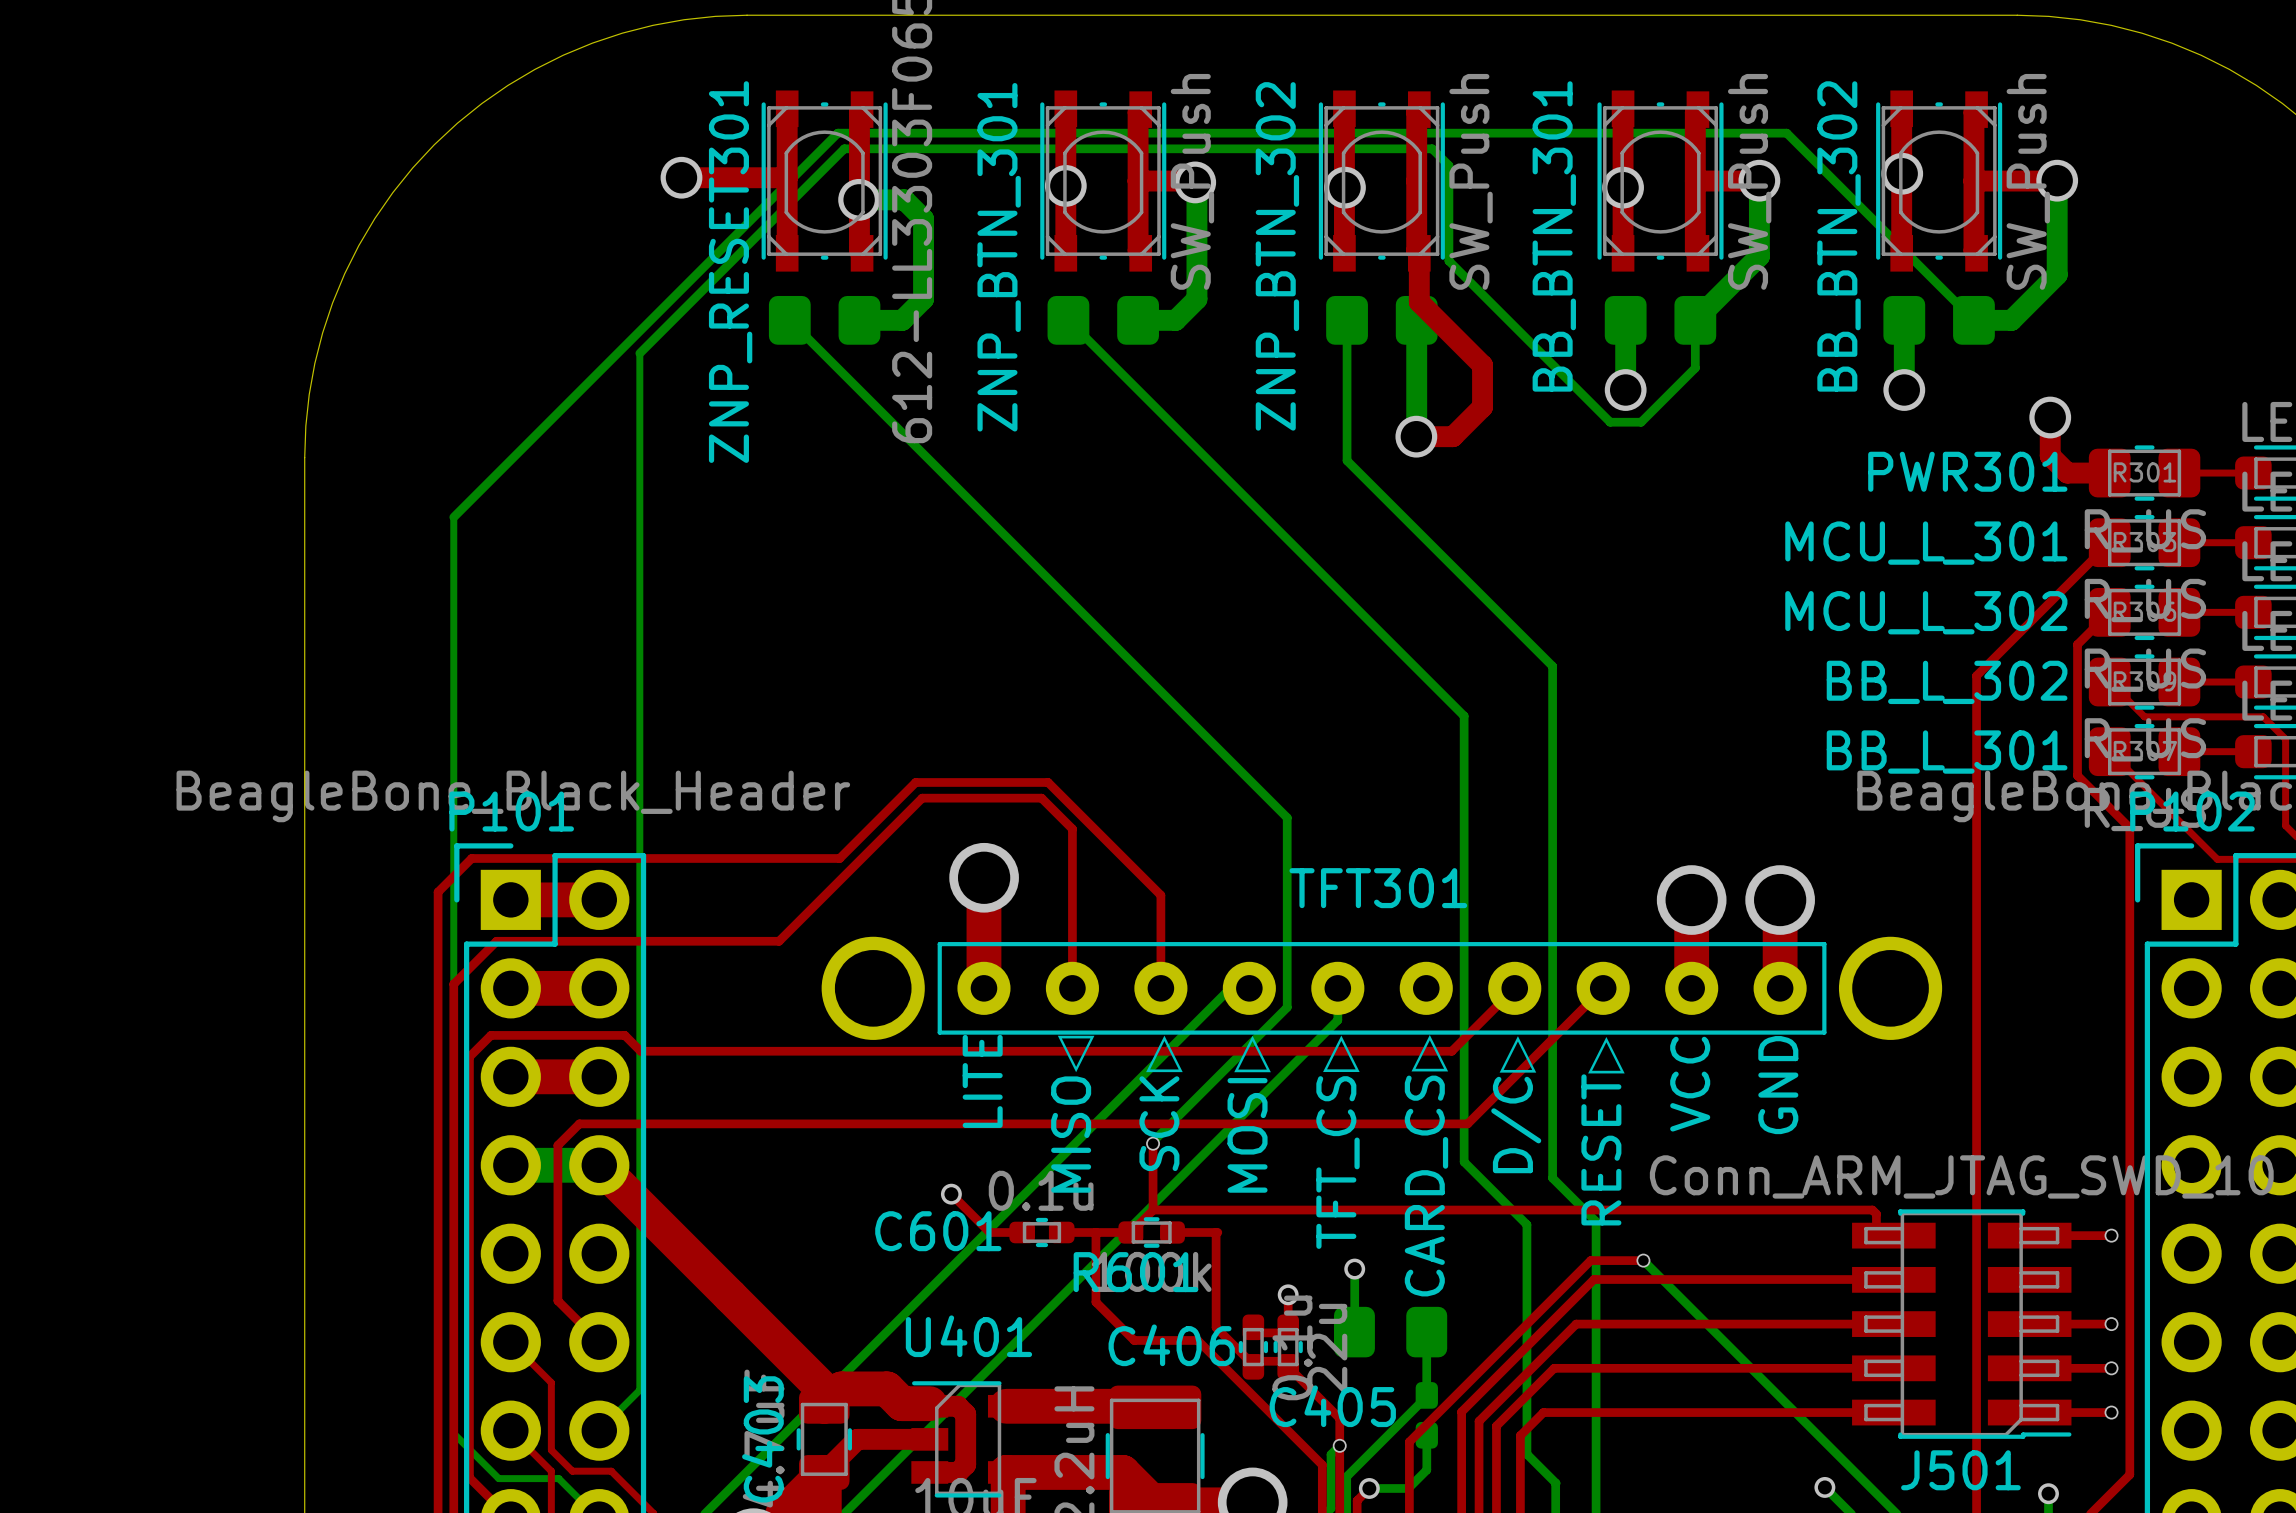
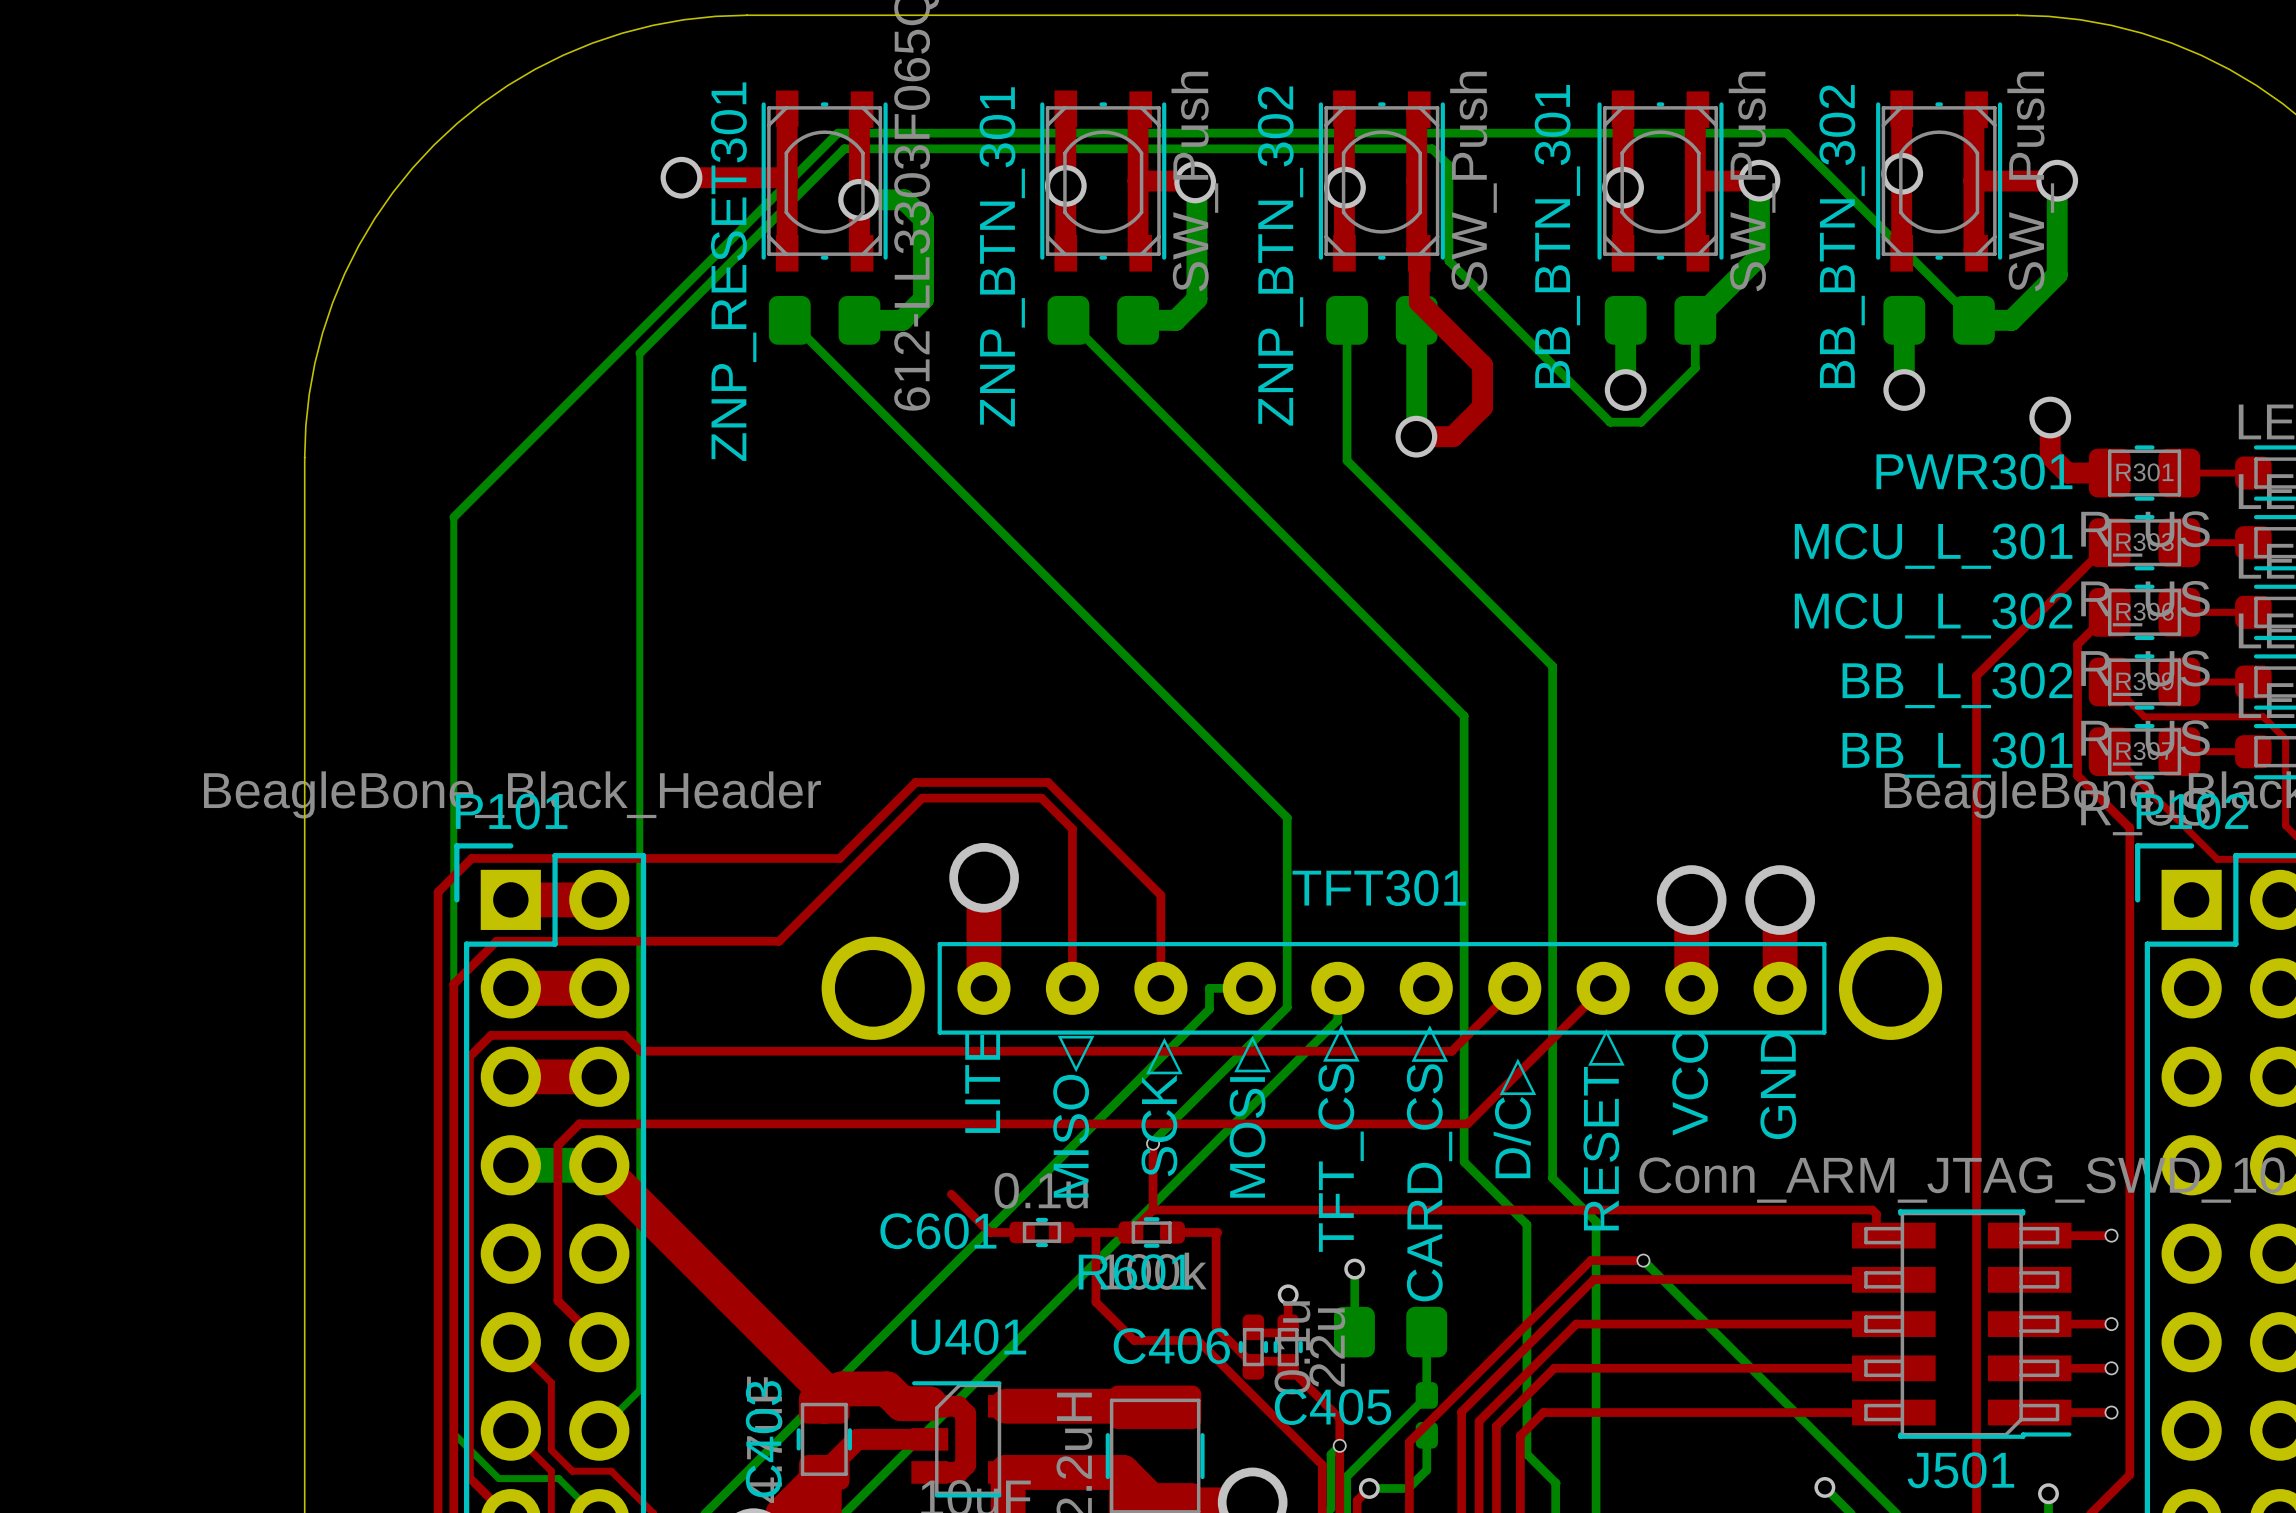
bottom track: (1230, 988) (1209, 1009) -> (1230, 988) (1209, 988) (1209, 1009)
via: (951, 1194) -> none

